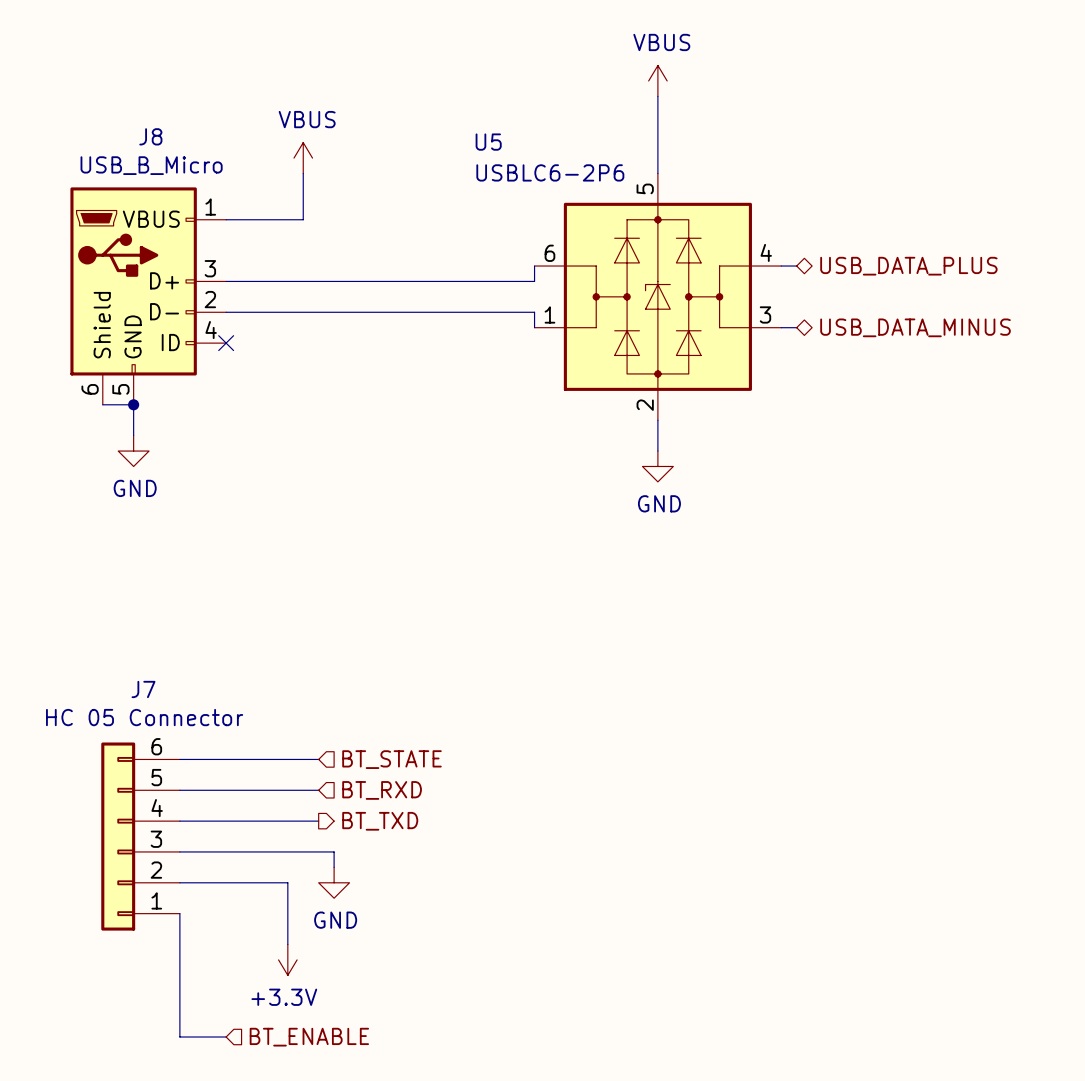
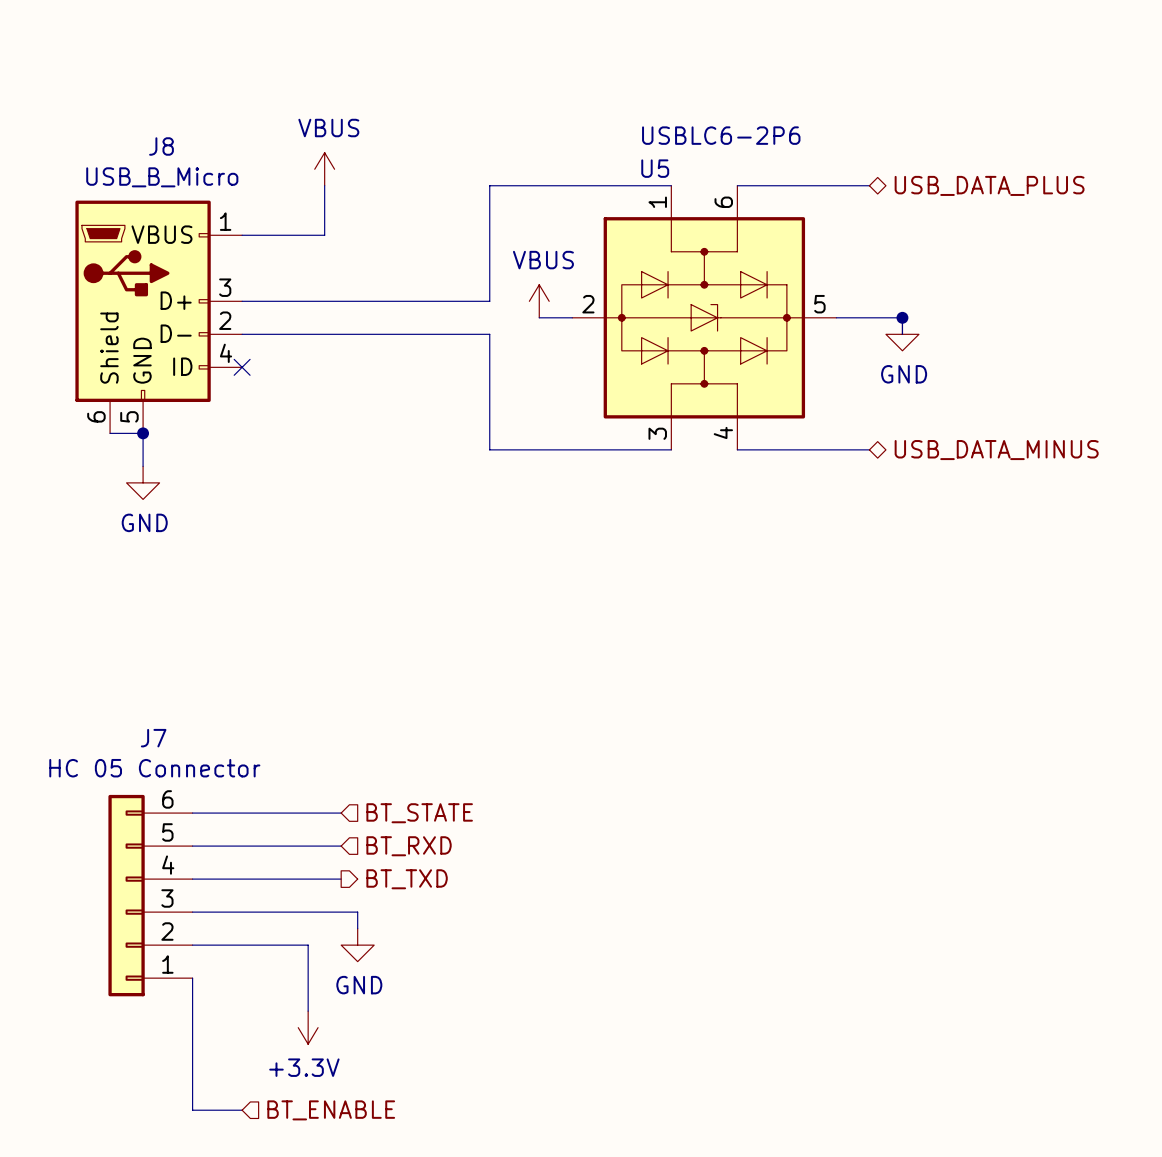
power symbol position: VBUS (657, 80) -> VBUS (539, 301)
wire: (657, 96) (657, 173) -> none
U5 name position: U5 (488, 142) -> U5 (655, 168)
U5 value position: USBLC6-2P6 (550, 172) -> USBLC6-2P6 (721, 135)
wire: none -> (737, 185) (869, 185)
wire: (534, 266) (534, 281) (457, 281) -> (671, 185) (489, 185) (489, 301)
wire: (781, 266) (796, 266) -> none
hierarchical label position: USB_DATA_PLUS (908, 266) -> USB_DATA_PLUS (989, 185)
wire: none -> (539, 317) (572, 317)
U5 rotation: 0° (657, 296) -> 90° clockwise (704, 317)
wire: none -> (836, 317) (902, 317) (902, 334)
junction: none -> (902, 317)
wire: (457, 312) (534, 312) (534, 327) -> (489, 334) (489, 449) (671, 449)
wire: (781, 327) (796, 327) -> none
hierarchical label position: USB_DATA_MINUS (915, 327) -> USB_DATA_MINUS (996, 450)
wire: (657, 420) (657, 451) -> none
wire: none -> (737, 449) (869, 449)
power symbol position: GND (657, 466) -> GND (902, 334)

